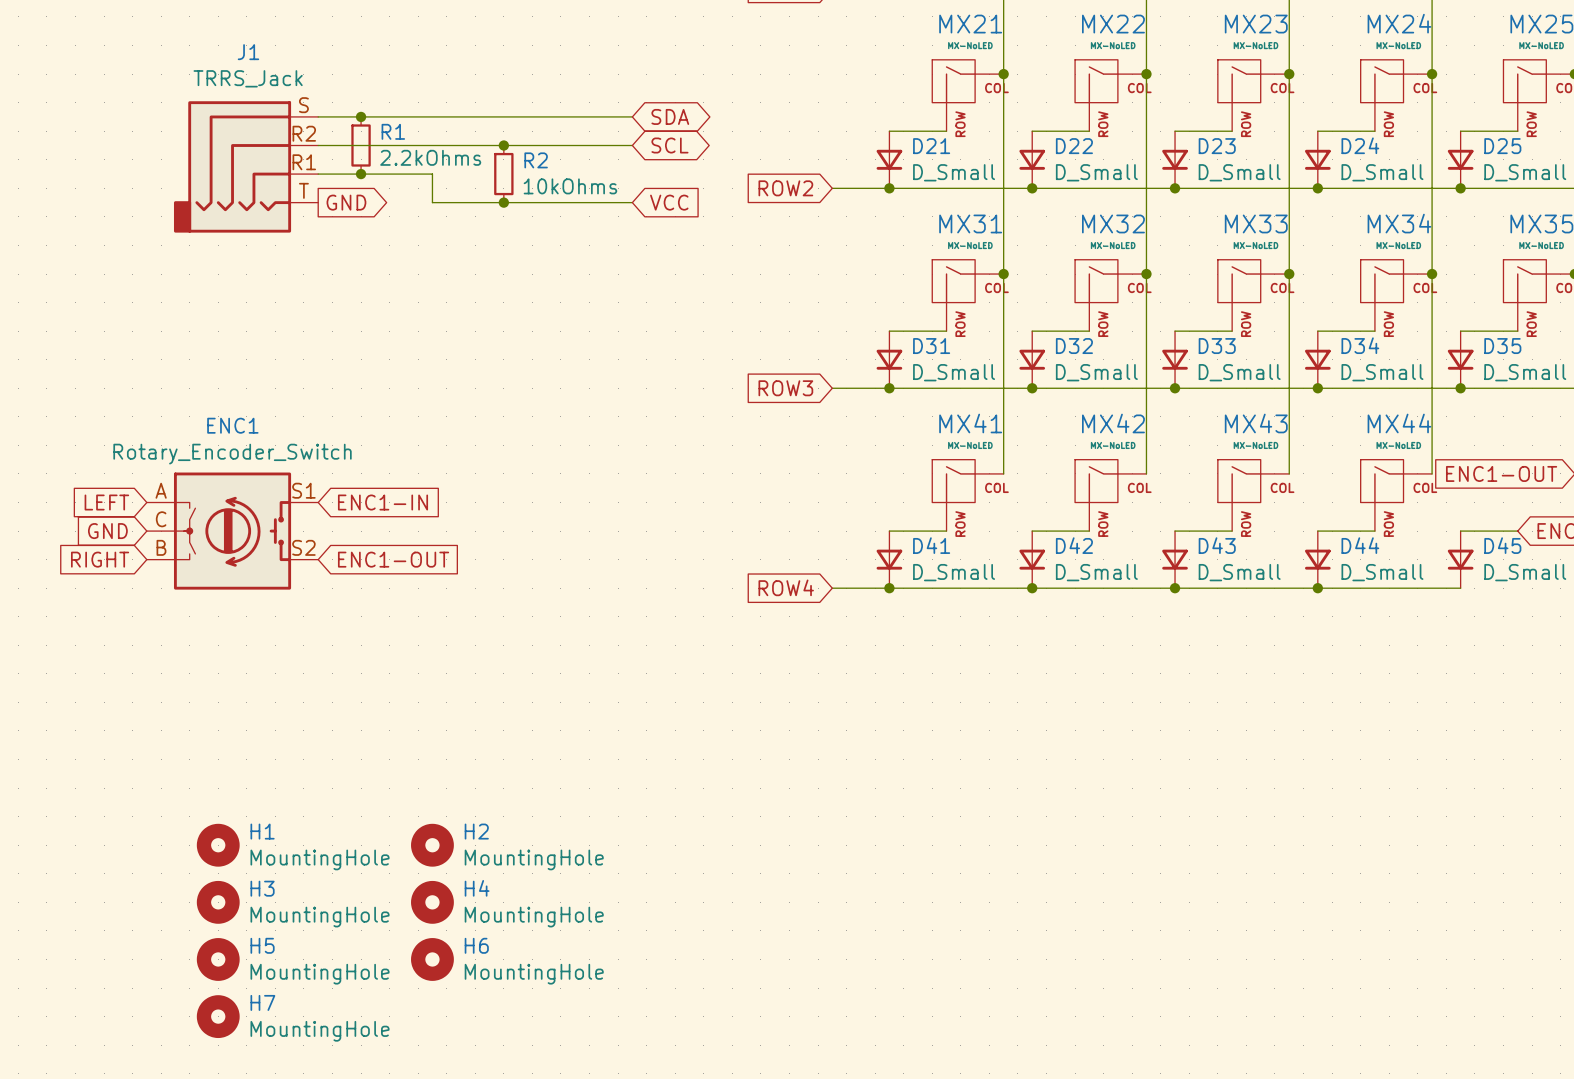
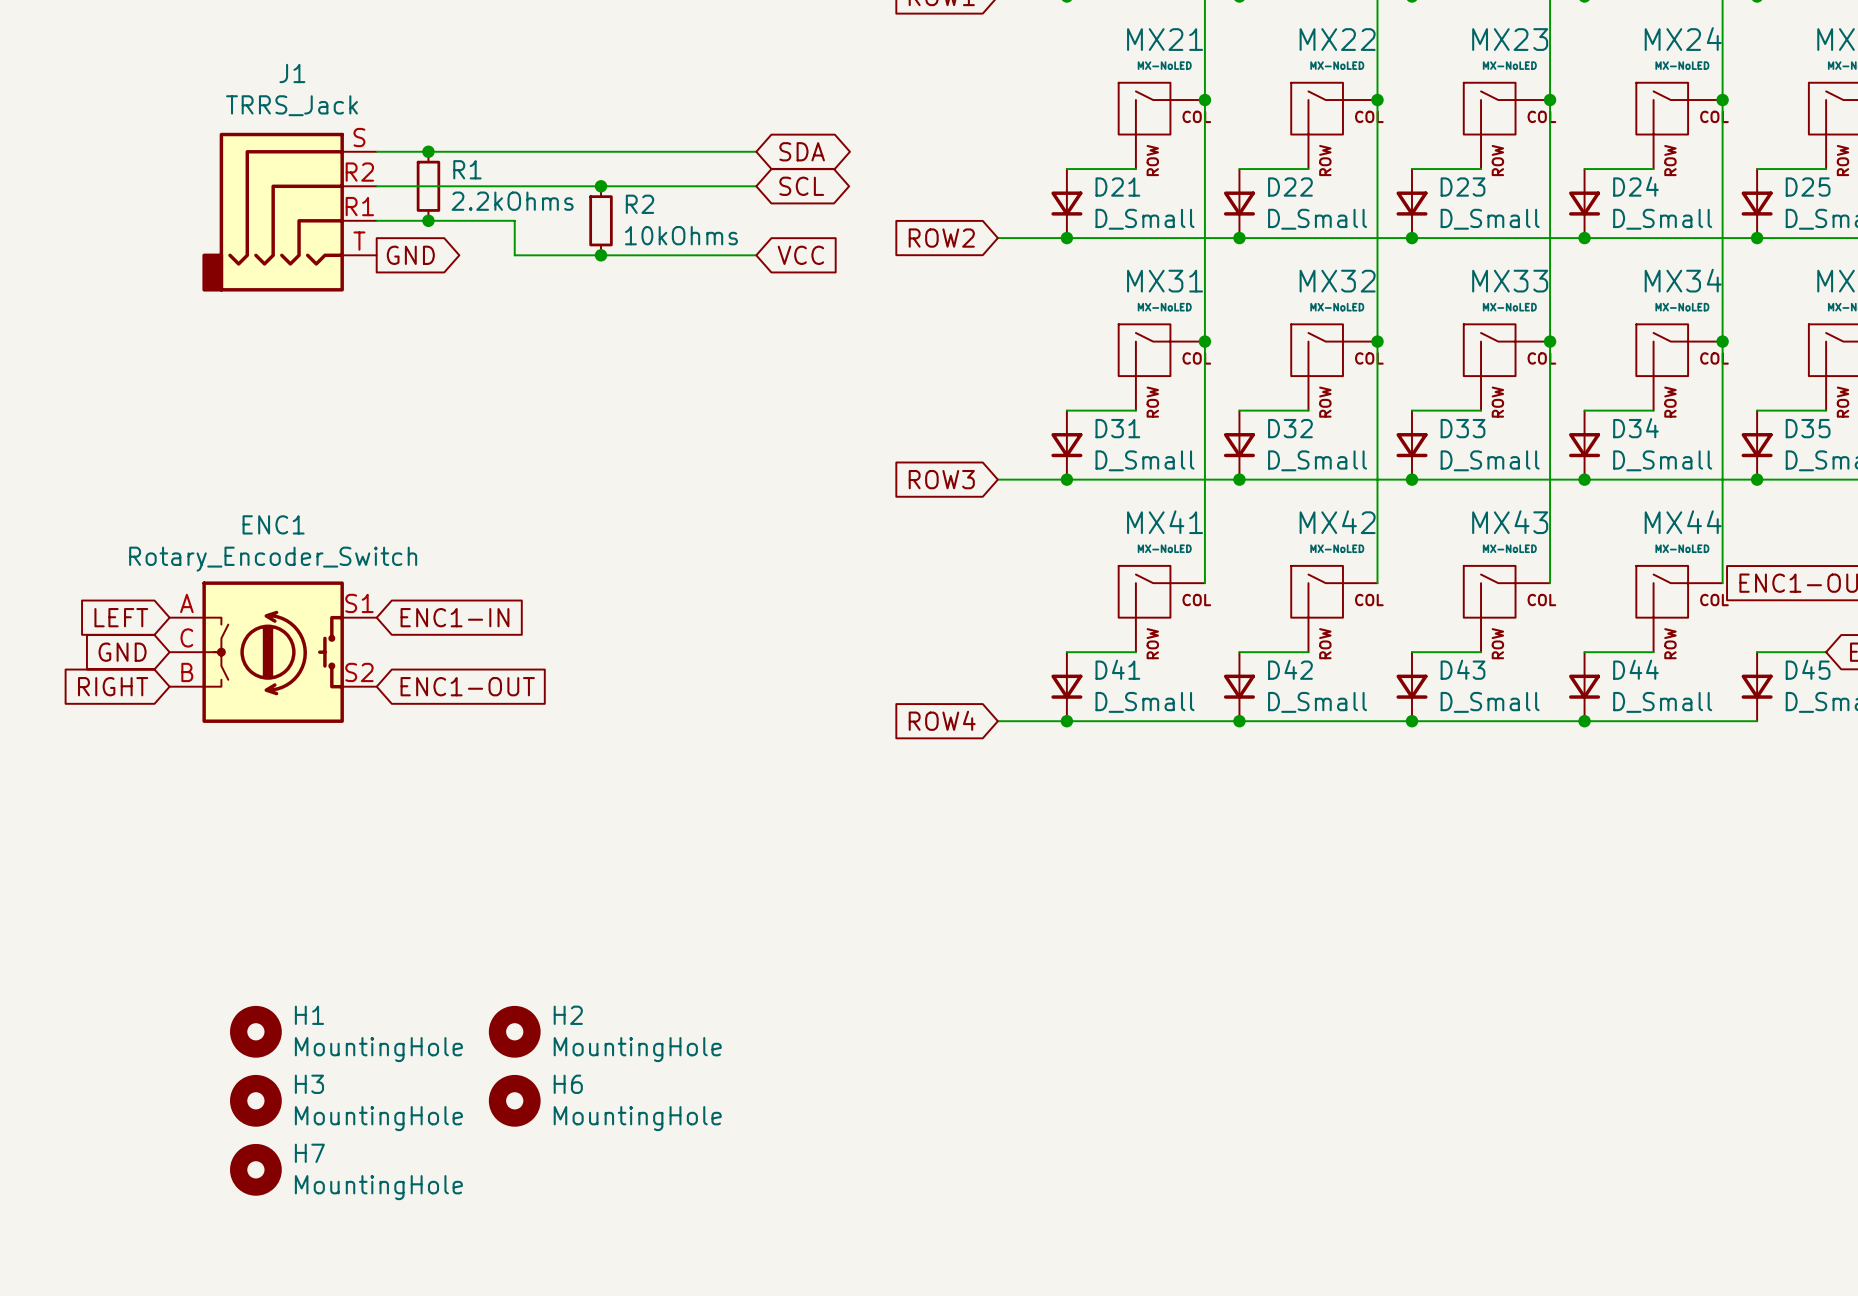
H4 name: H4 (477, 888) -> H6 (568, 1084)
H5 name: H5 (262, 945) -> H7 (309, 1153)
H6: MountingHole (432, 959) -> none
H7: MountingHole (218, 1016) -> none

